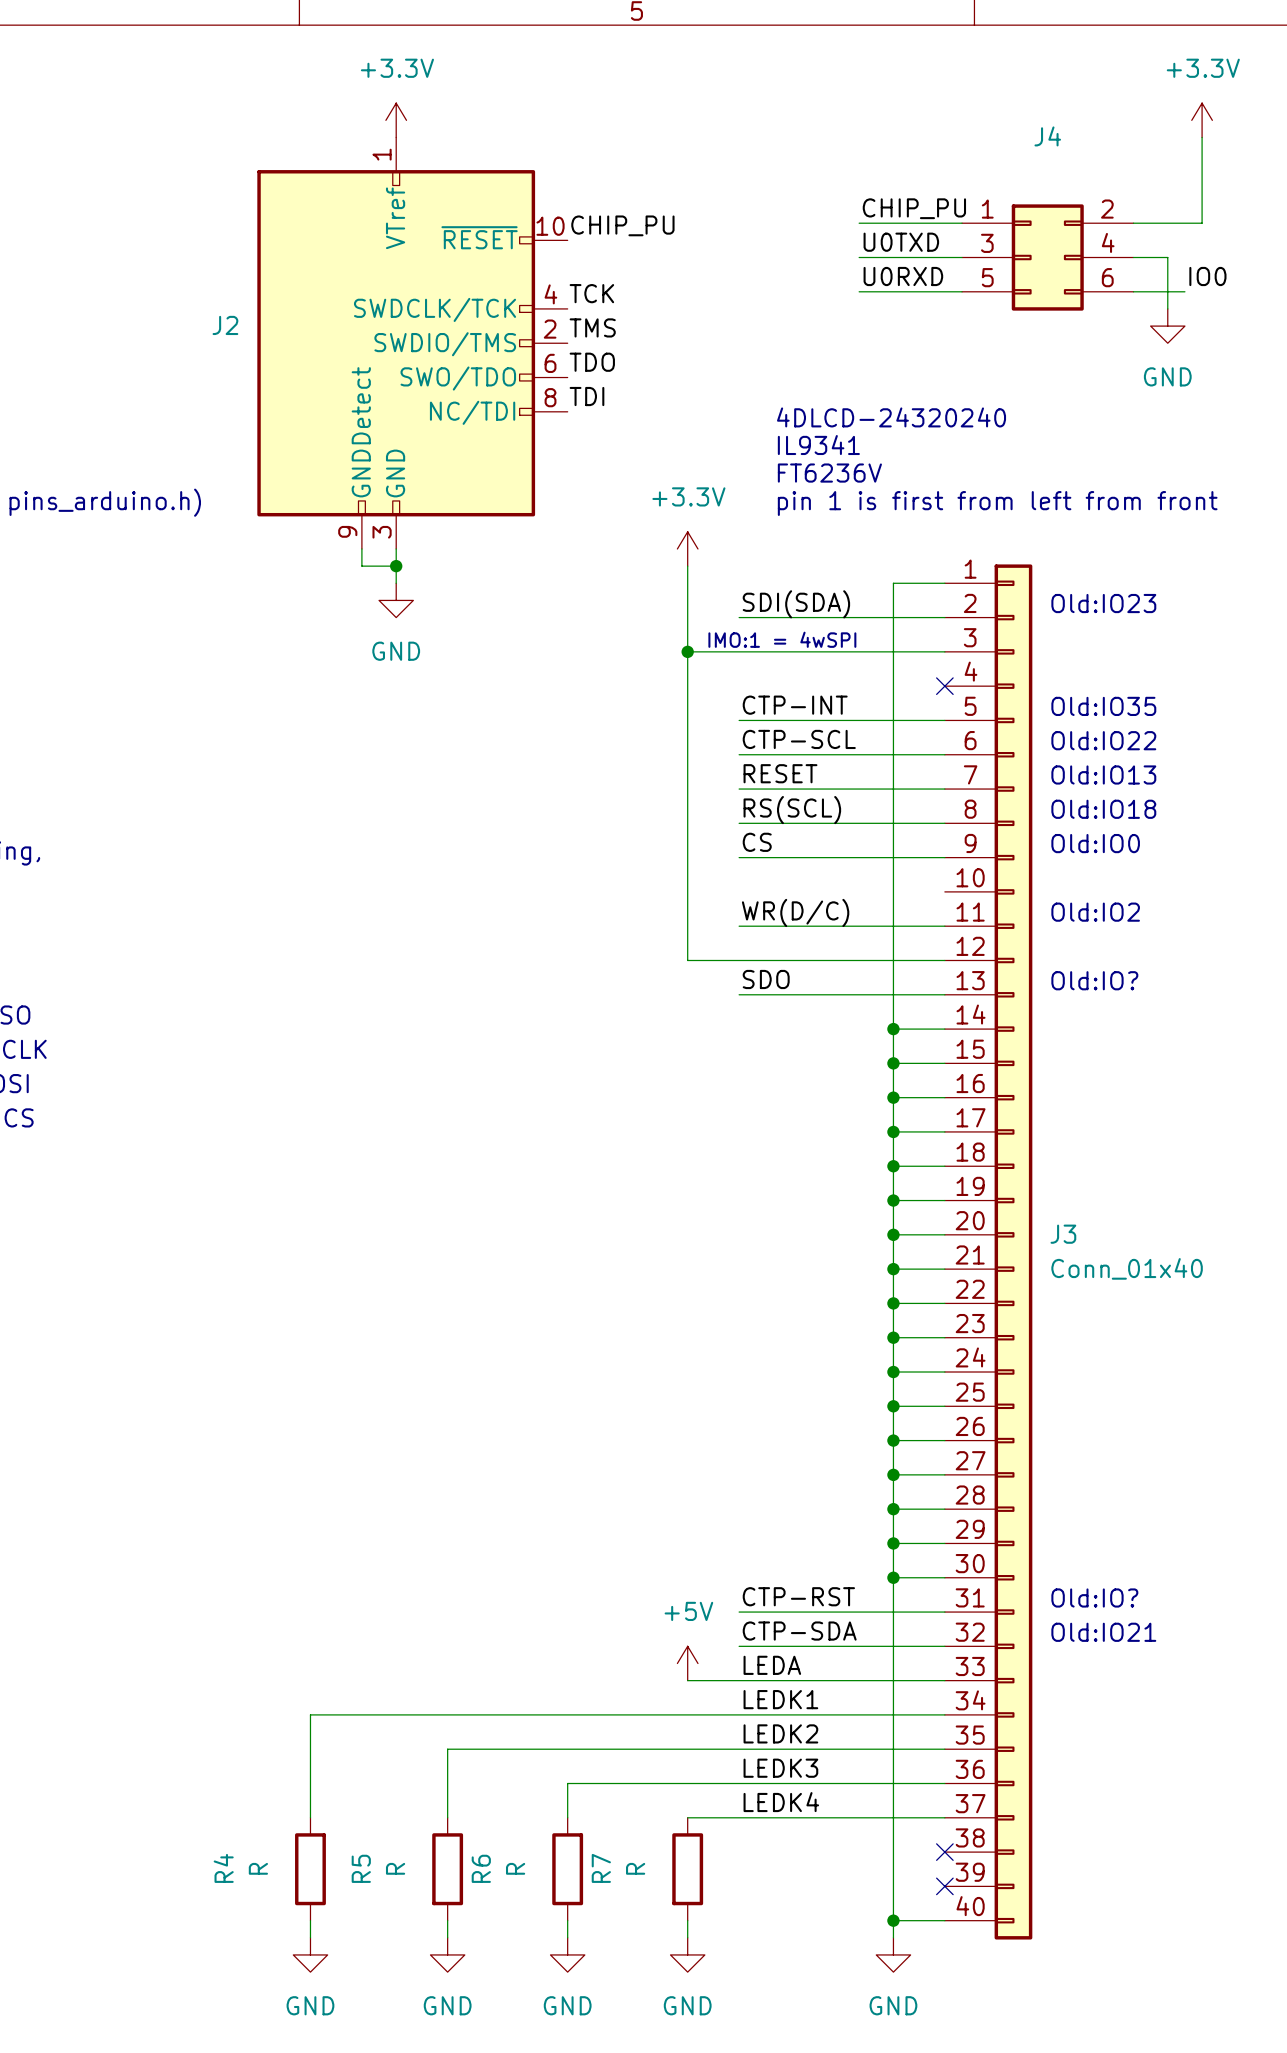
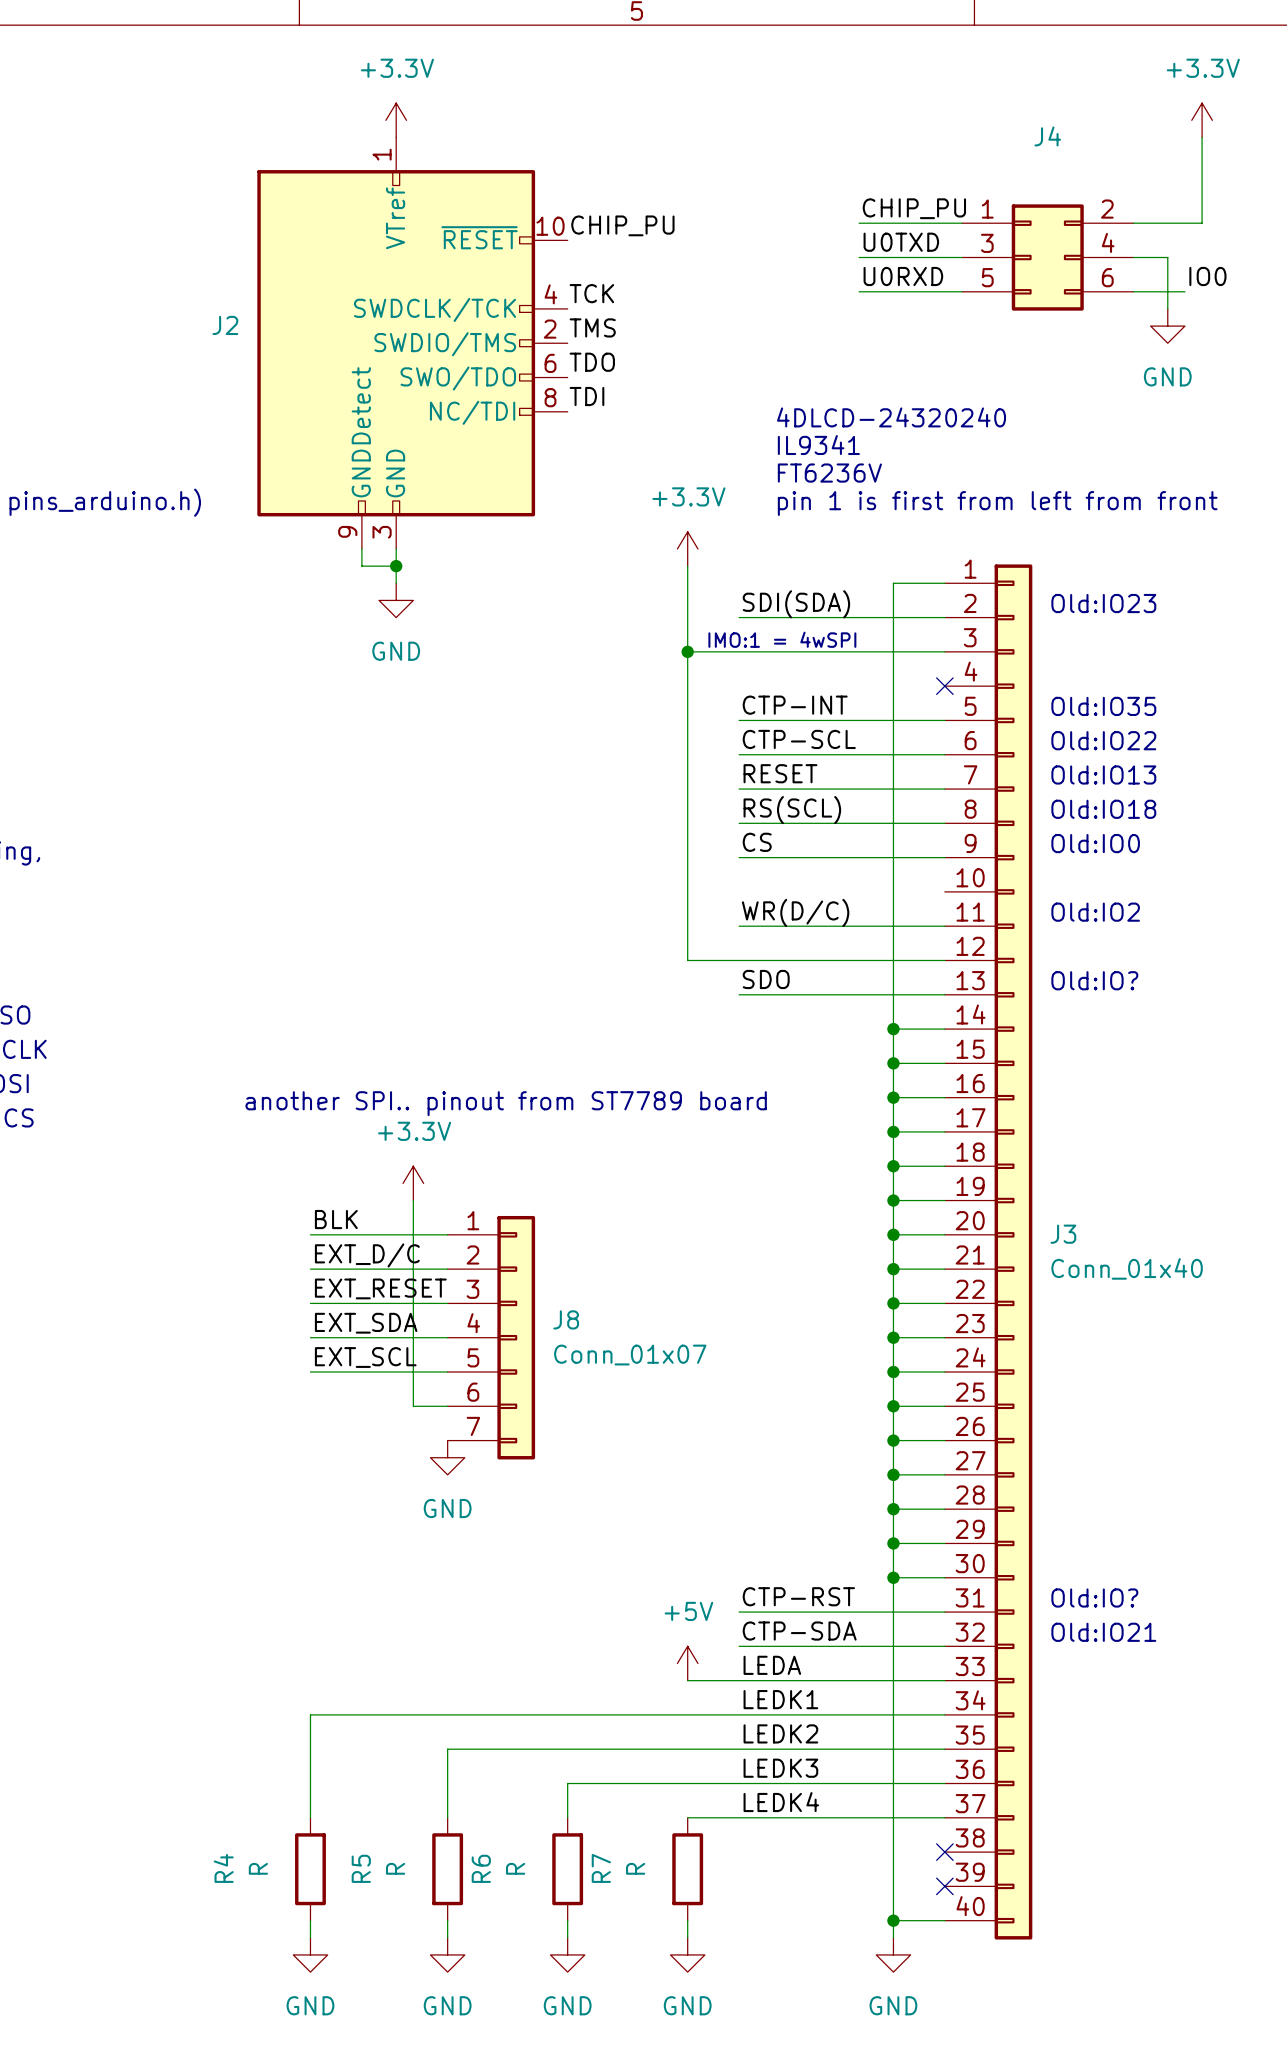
text: none -> another SPI.. pinout from ST7789 board (506, 1103)
power symbol: none -> +3.3V (413, 1183)
wire: none -> (413, 1200) (413, 1406) (447, 1406)
label: none -> BLK (336, 1219)
wire: none -> (310, 1234) (447, 1234)
label: none -> EXT_D/C (367, 1255)
wire: none -> (310, 1269) (447, 1269)
label: none -> EXT_RESET (380, 1288)
wire: none -> (310, 1303) (447, 1303)
label: none -> EXT_SDA (366, 1323)
wire: none -> (310, 1337) (447, 1337)
J8: none -> Conn_01x07 (491, 1337)
label: none -> EXT_SCL (365, 1357)
wire: none -> (310, 1372) (447, 1372)
power symbol: none -> GND (447, 1457)

